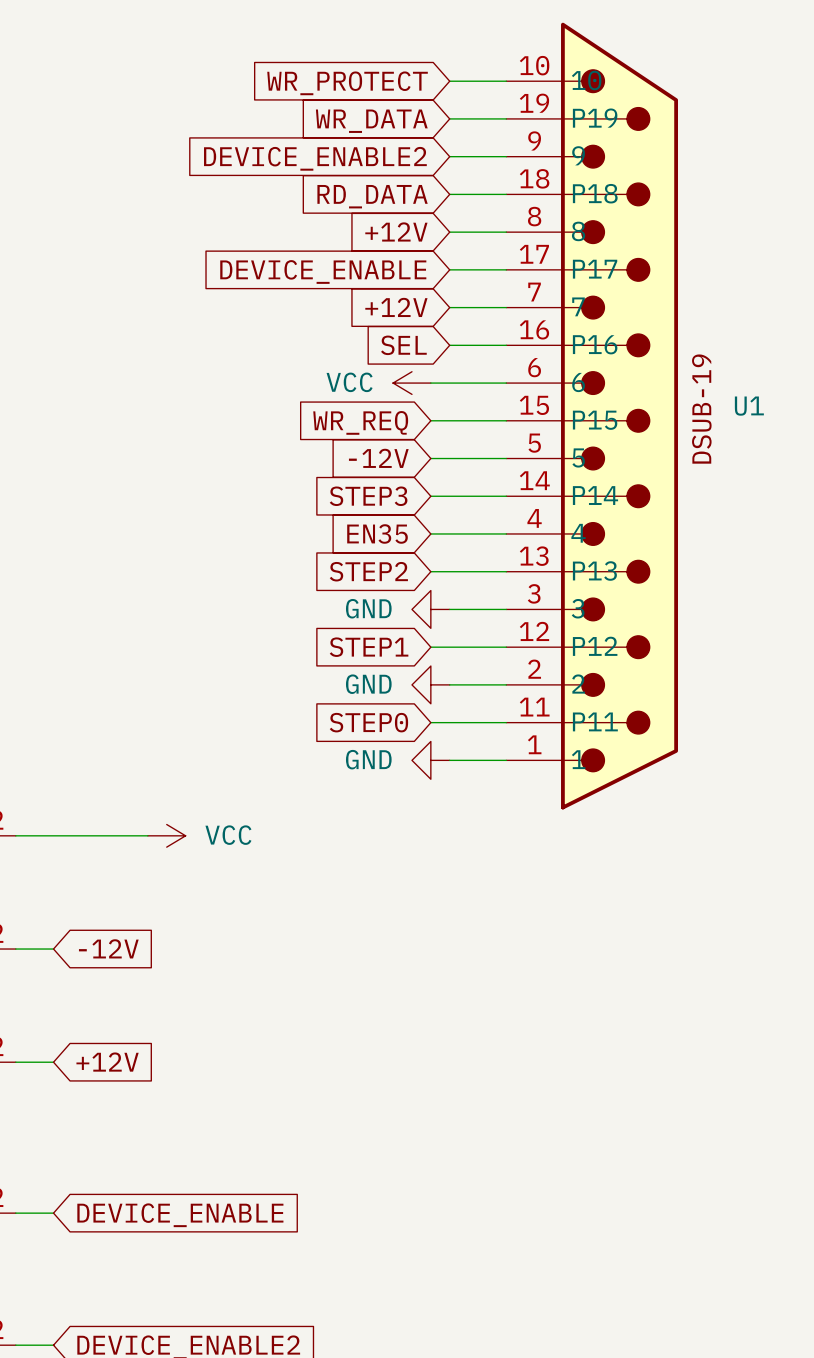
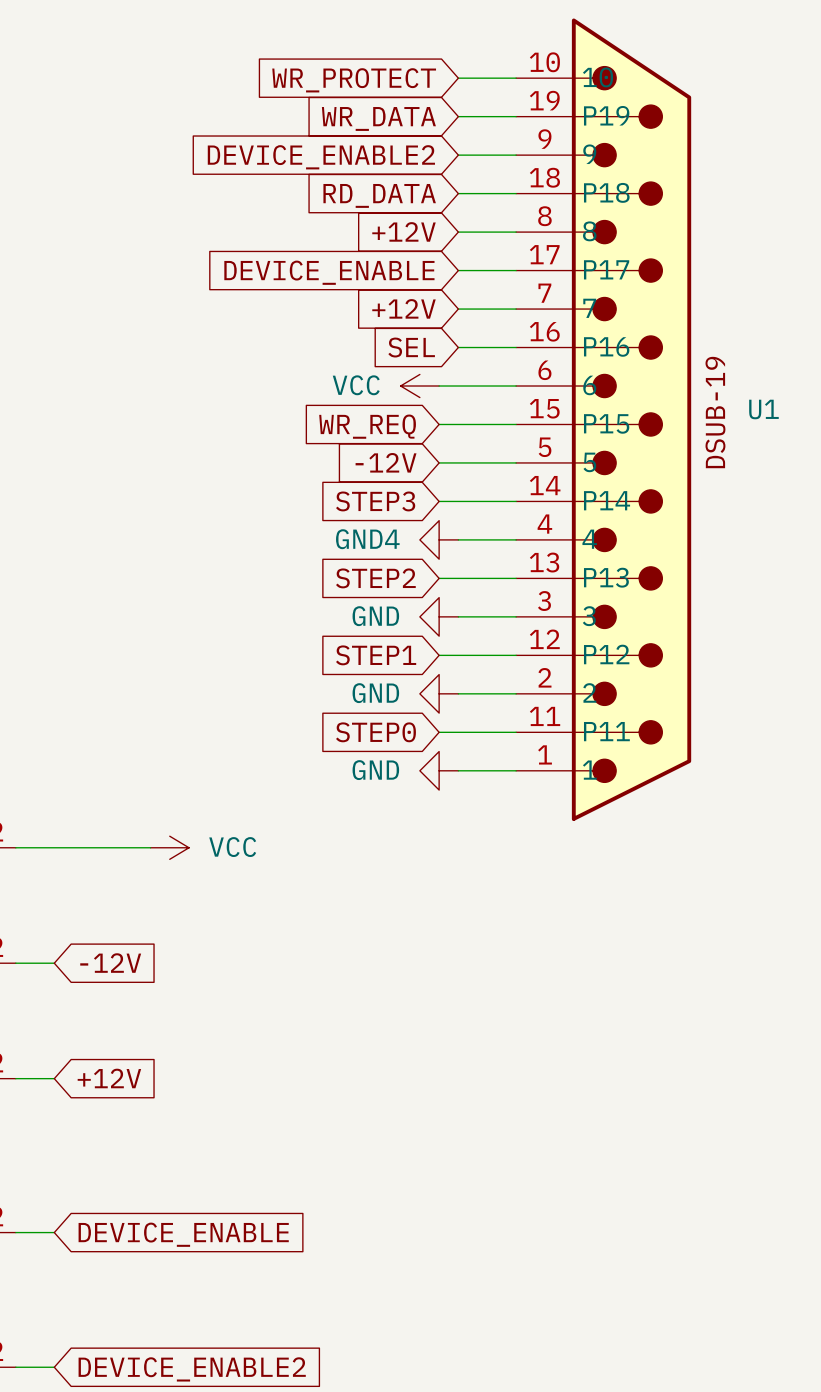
global label: EN35 (377, 533) -> none
power symbol: none -> GND4 (439, 539)

